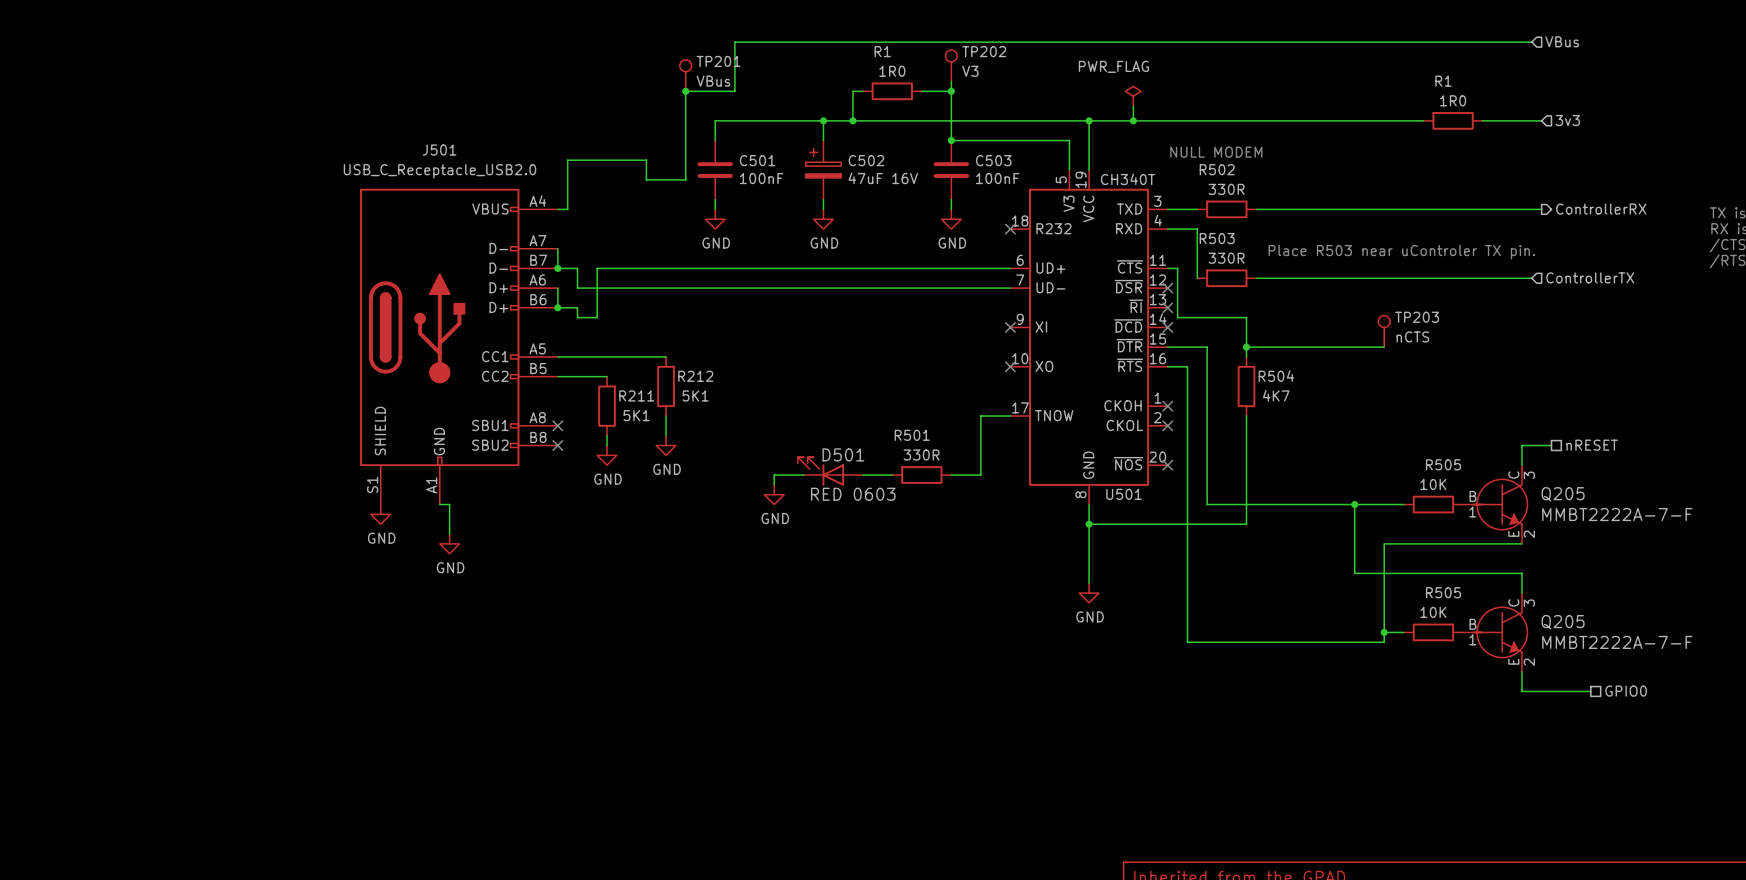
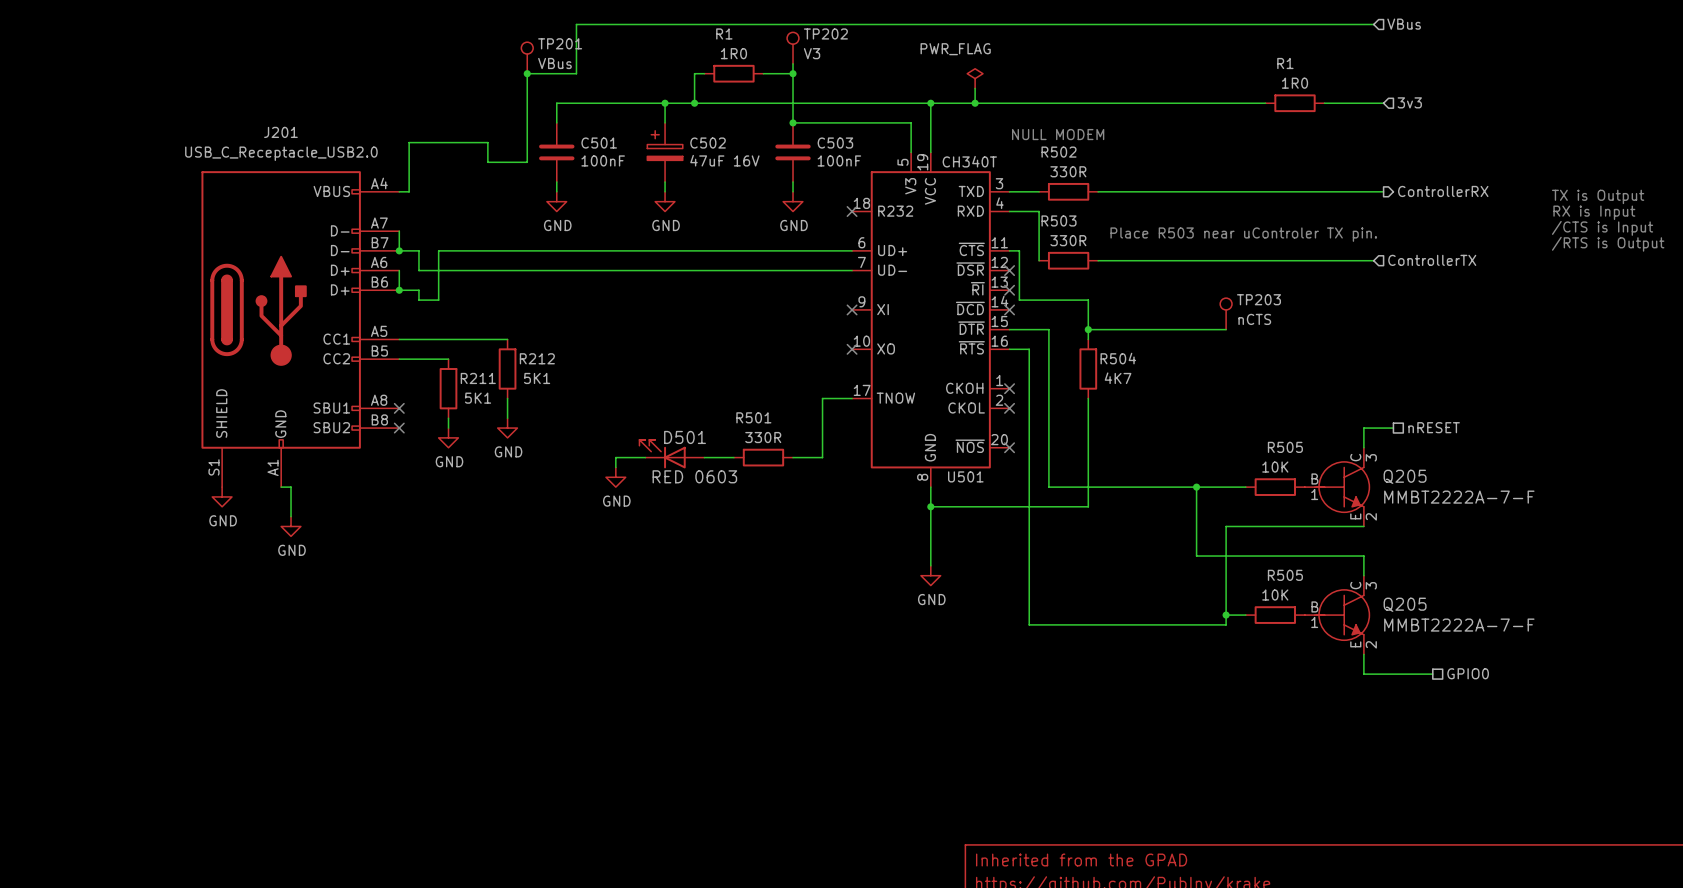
J501 name: J501 (439, 150) -> J201 (280, 132)

